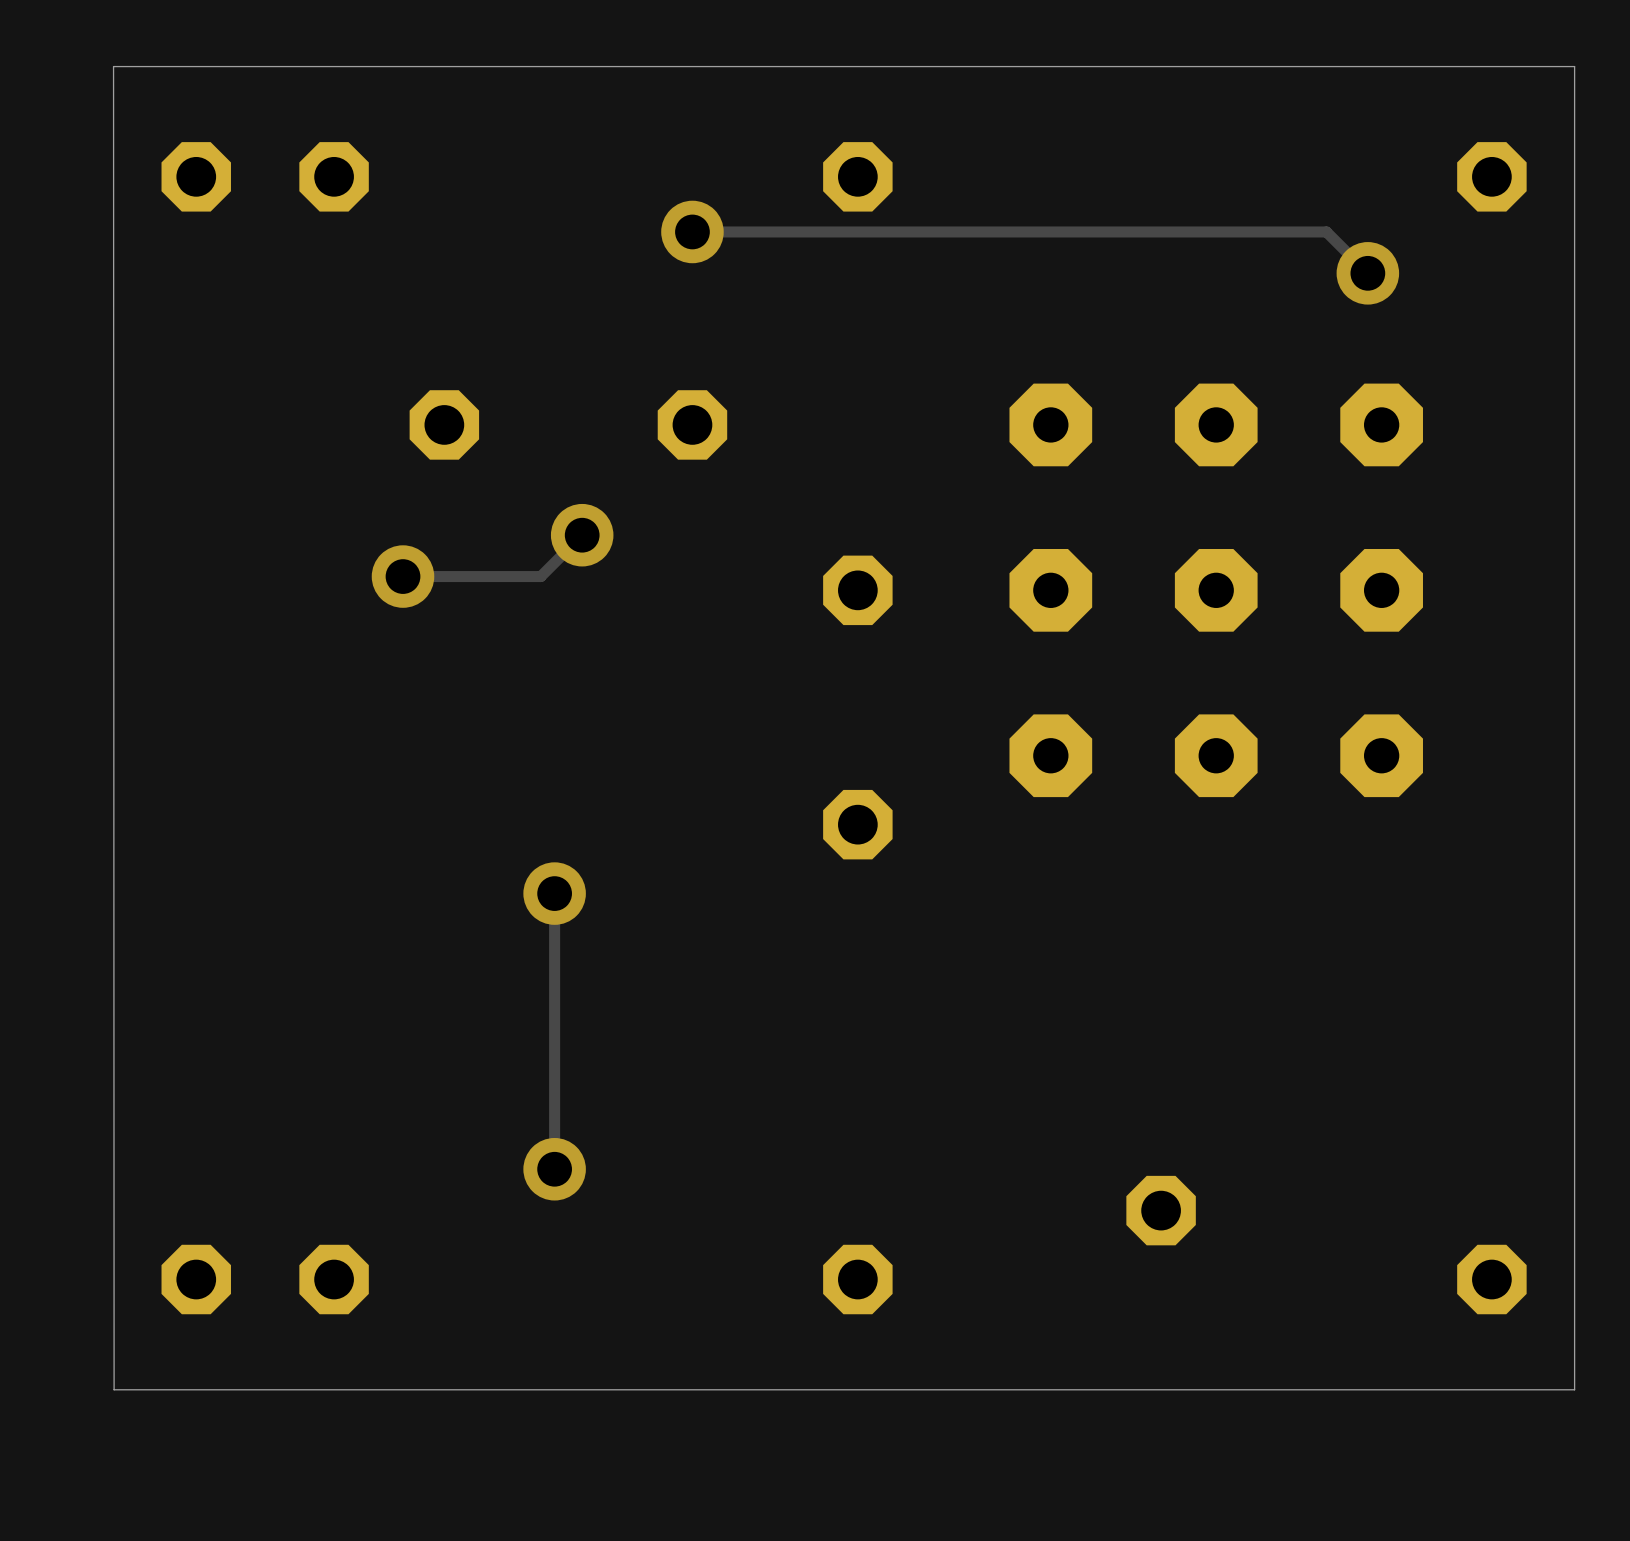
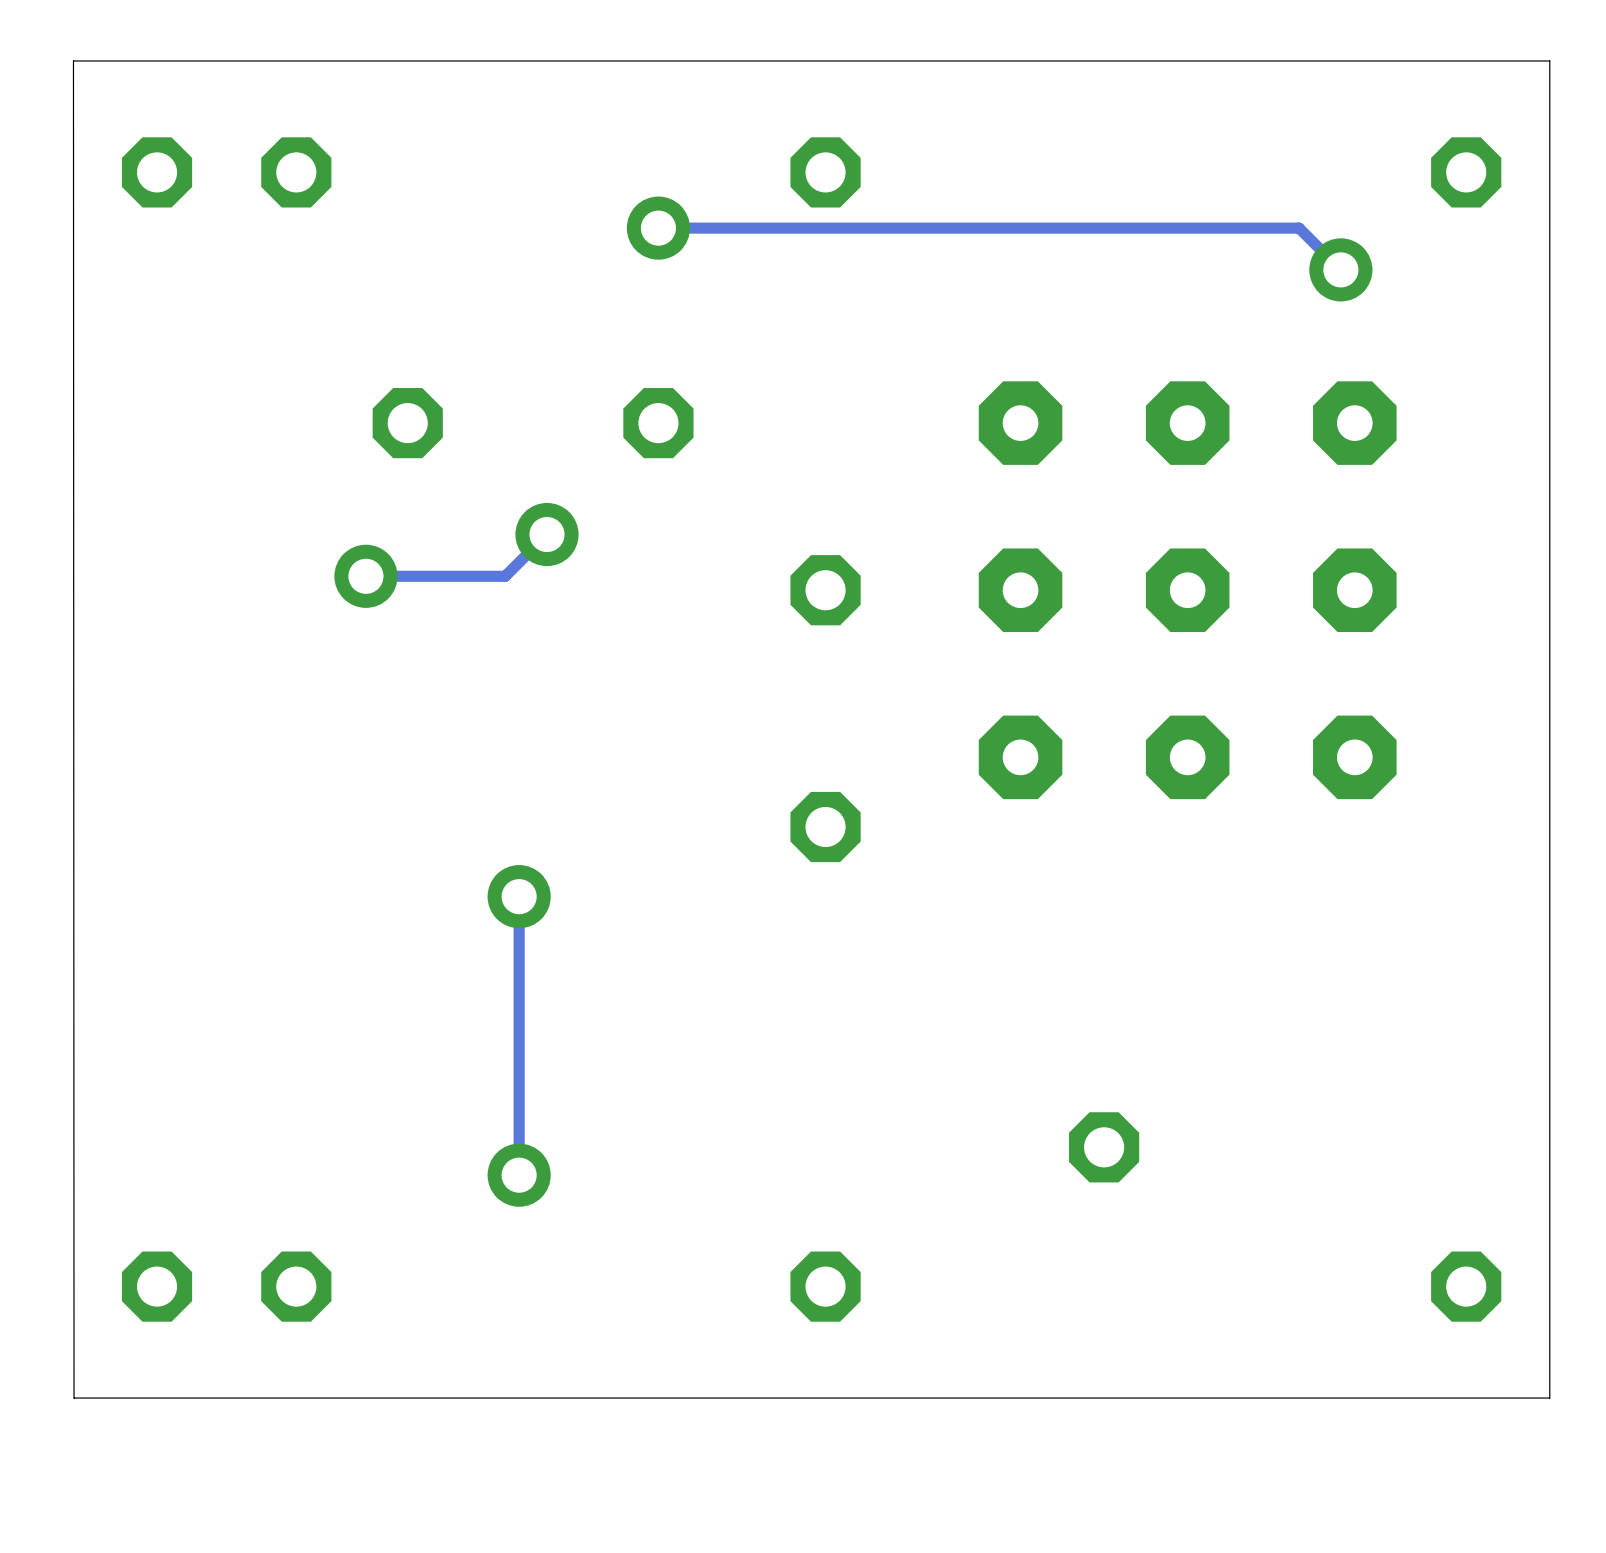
part position: (1161, 1210) -> (1104, 1147)

